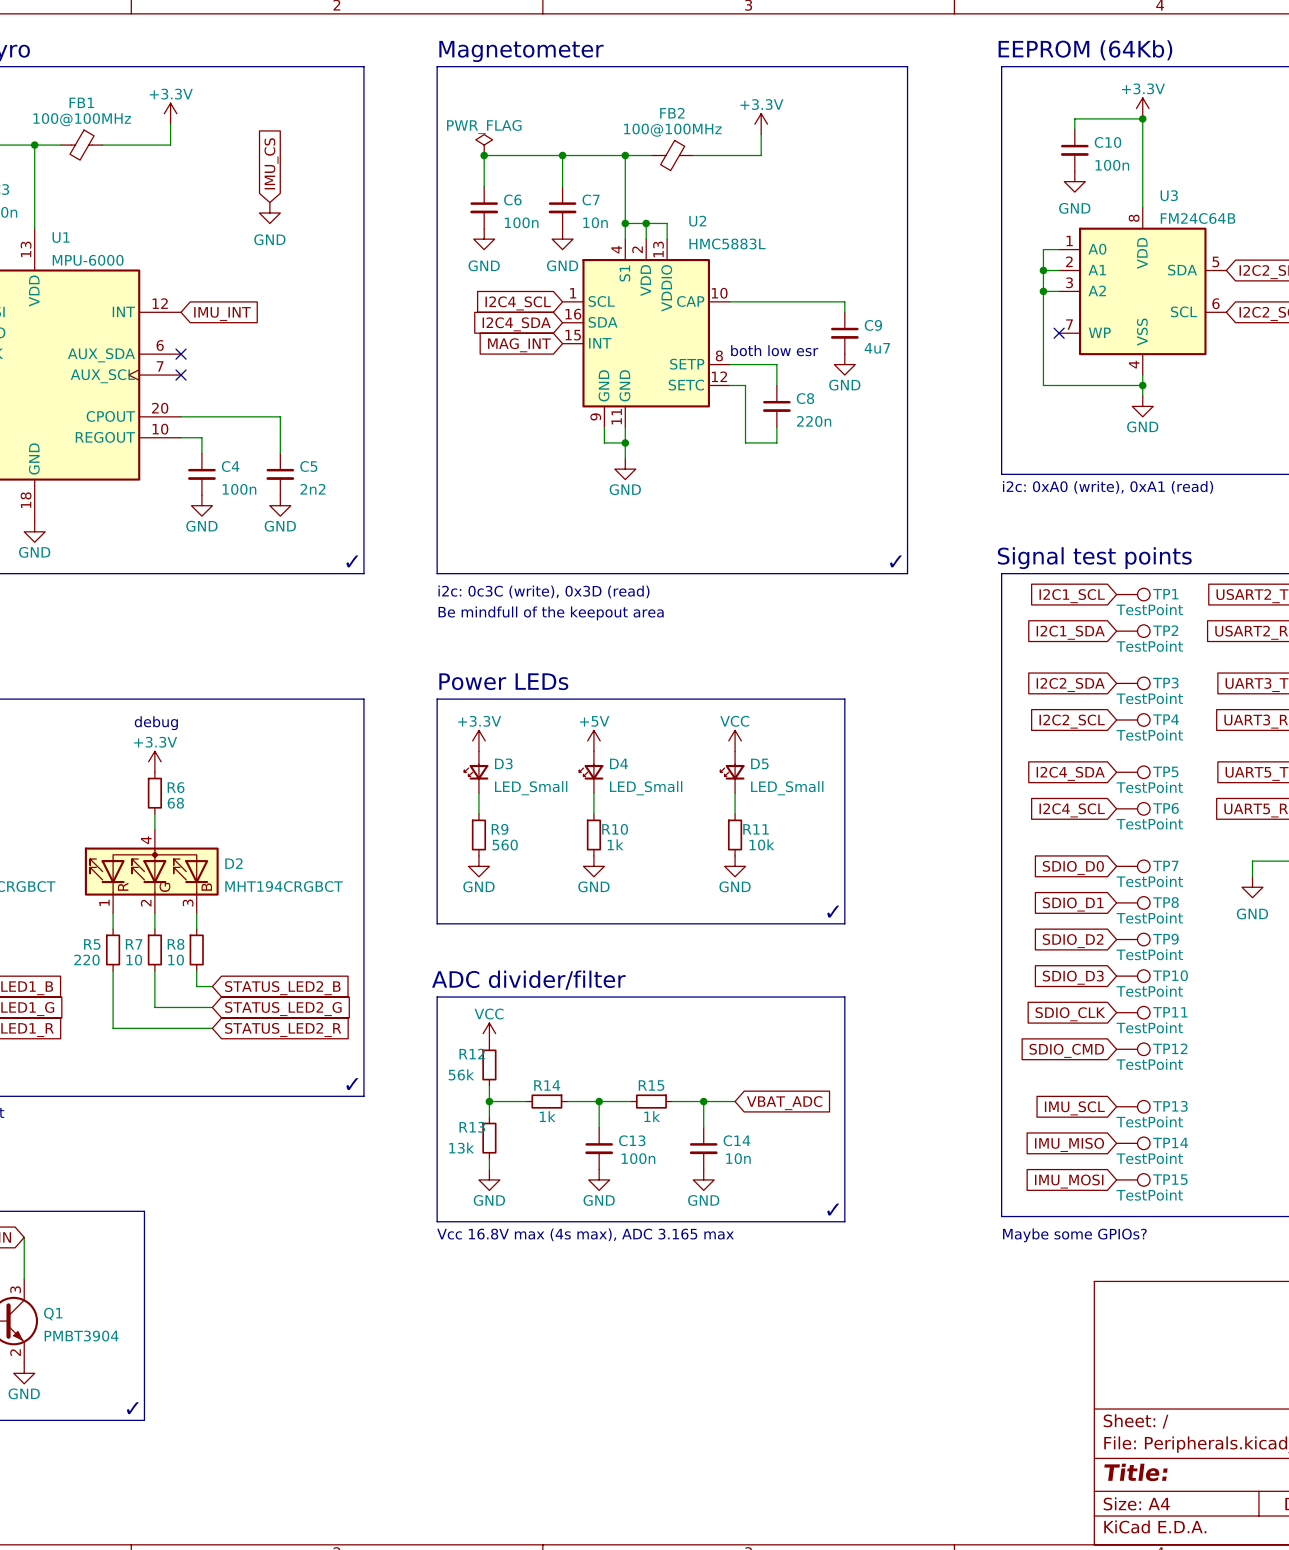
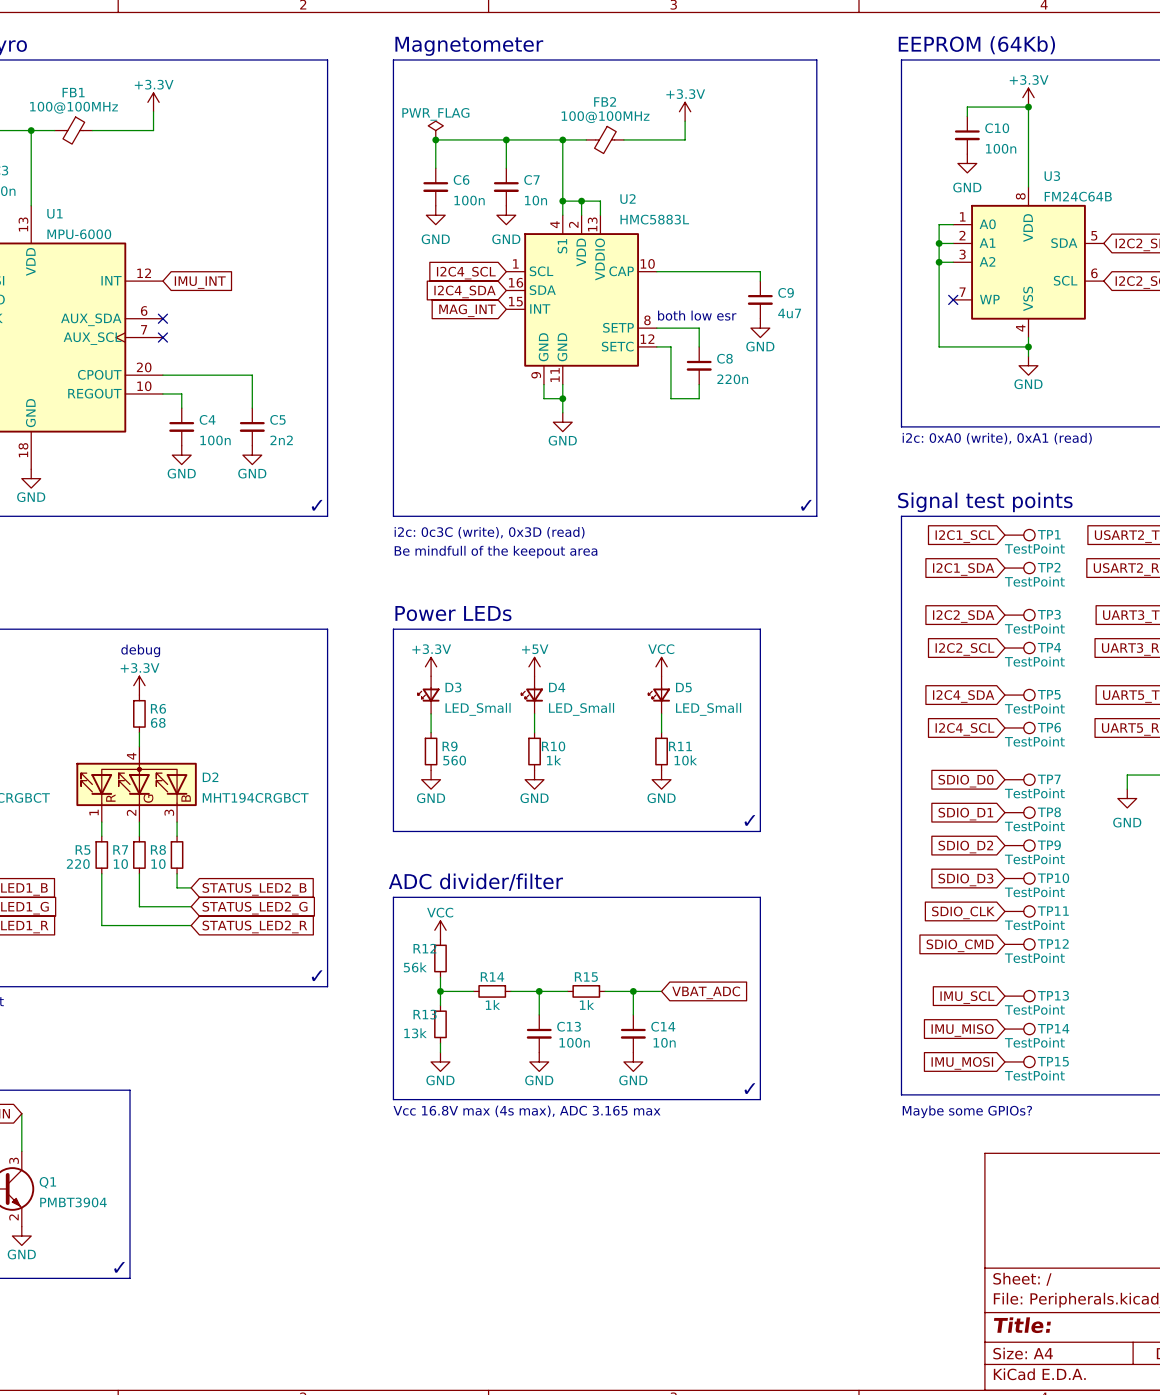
global label: IMU_CS (271, 163) -> none
power symbol: GND (269, 213) -> none

